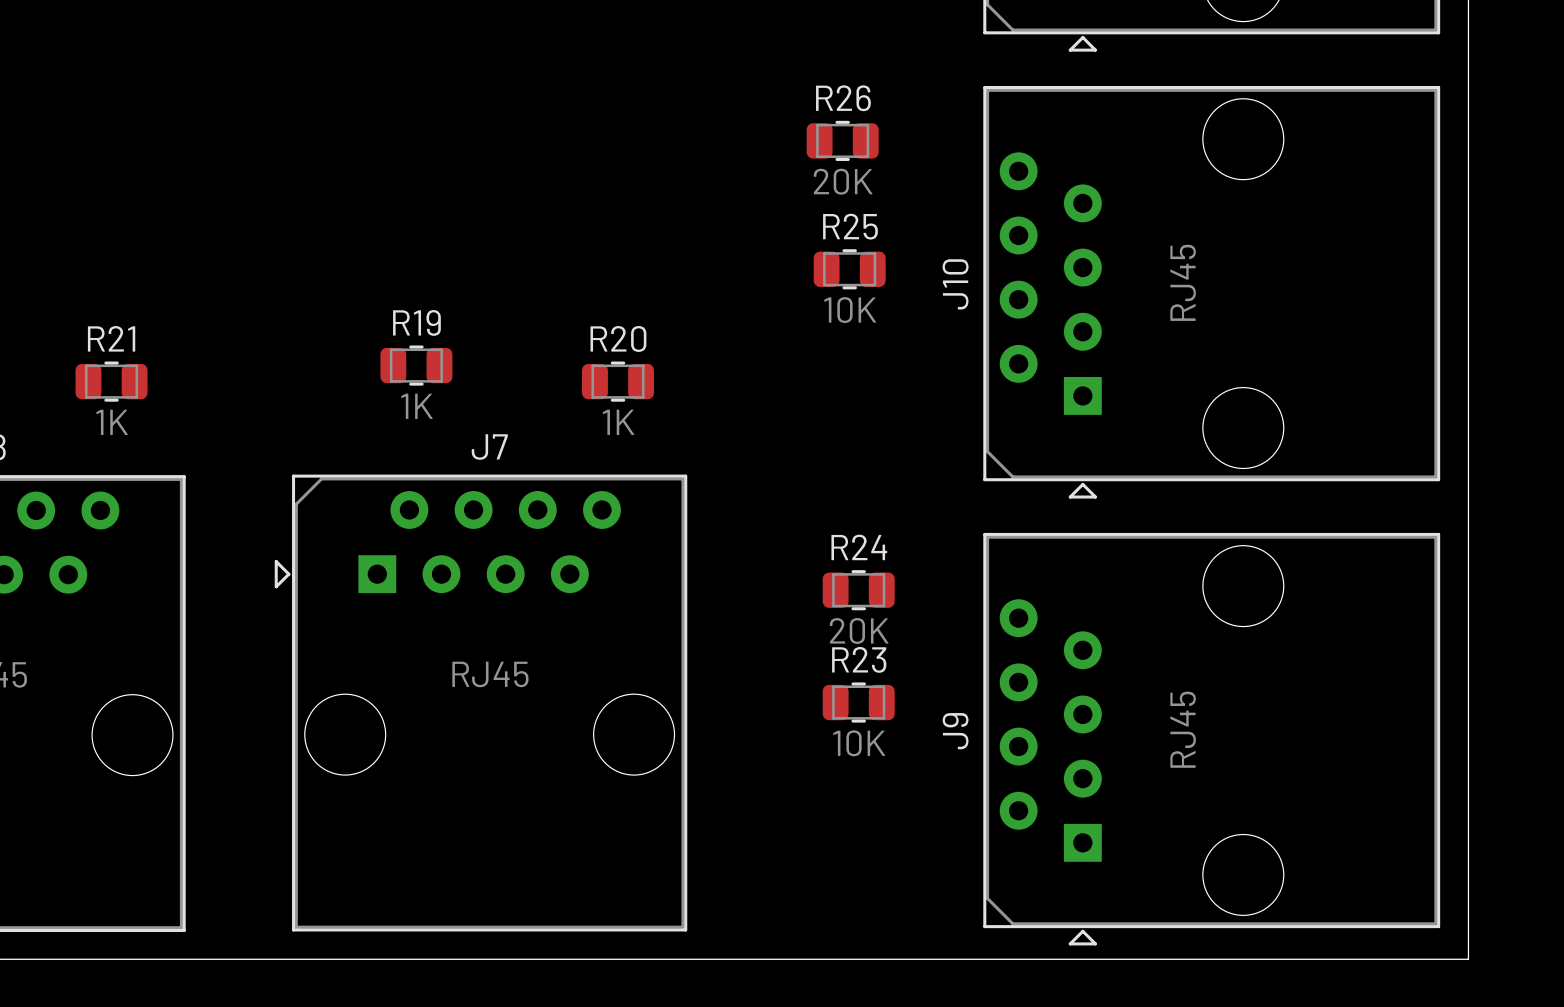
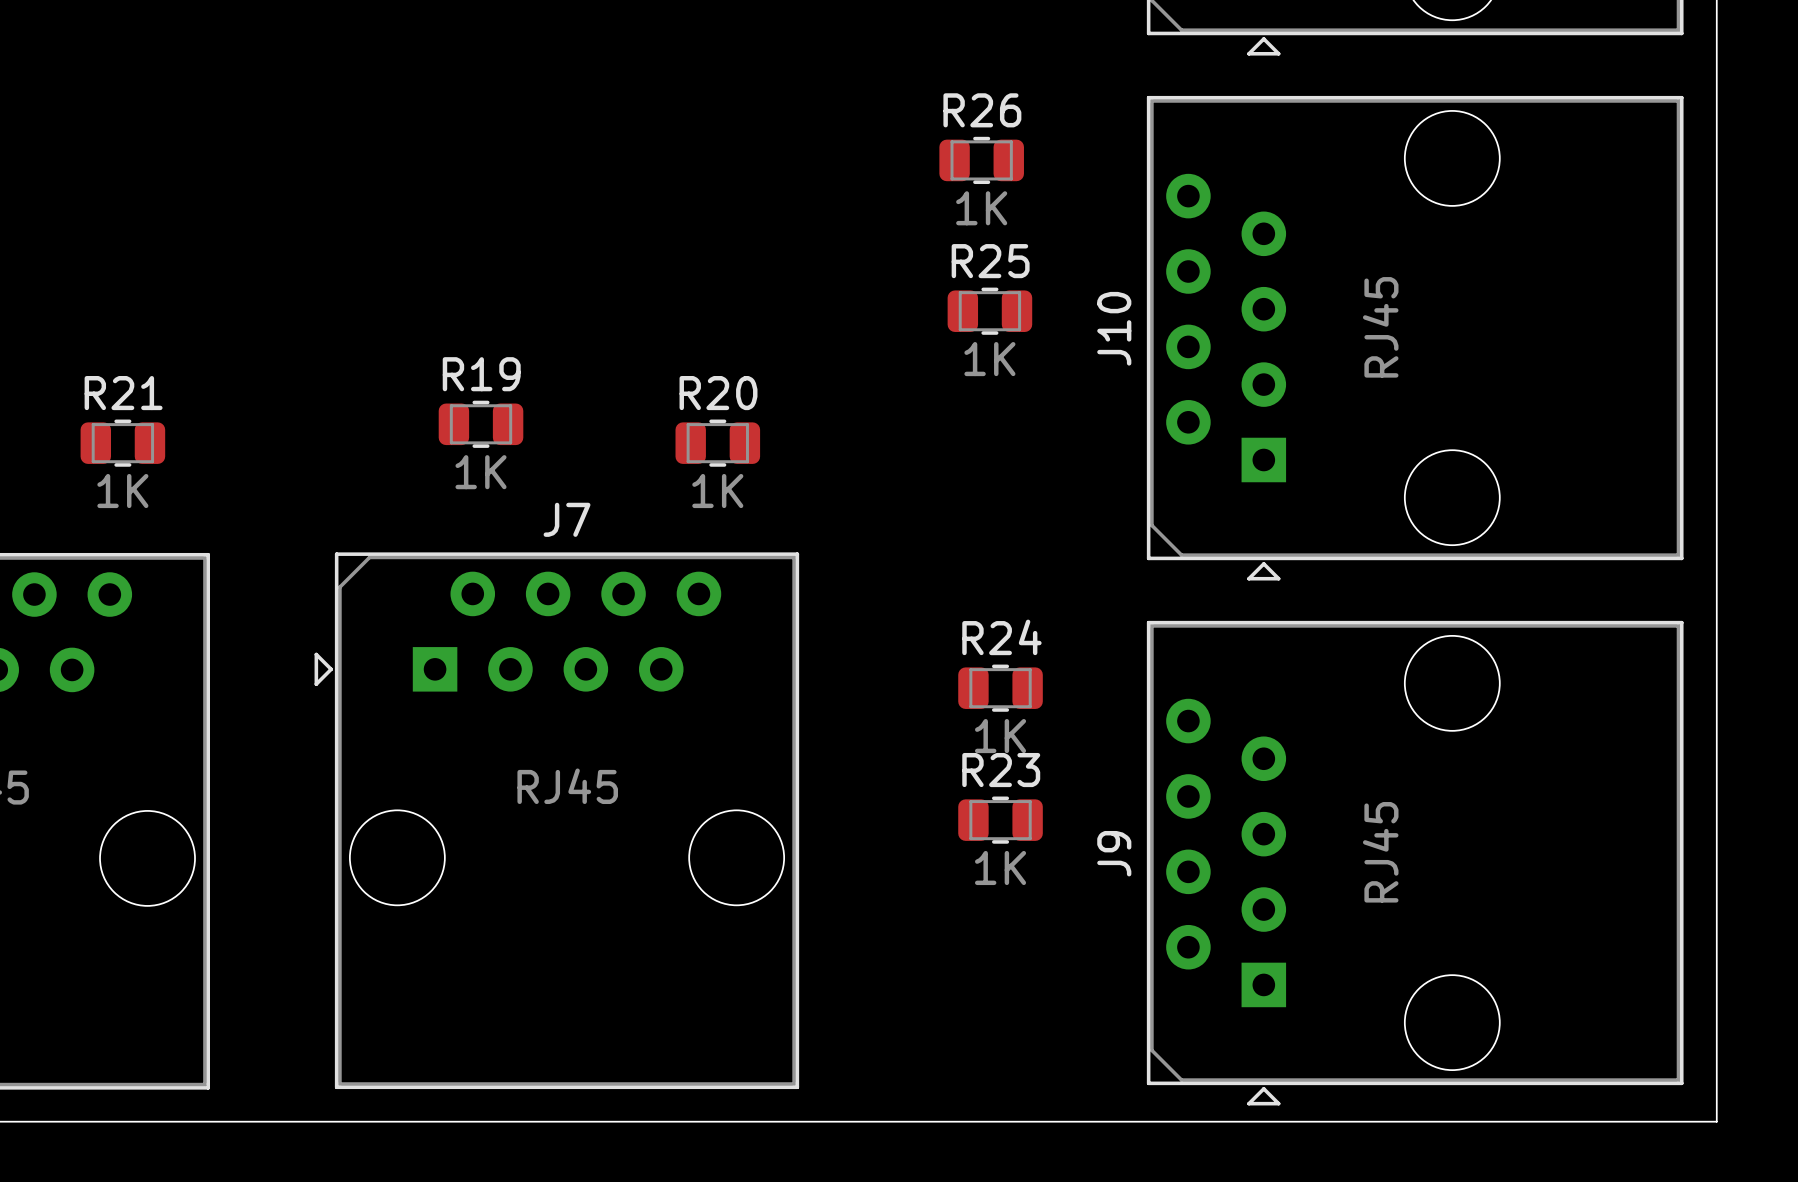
R26 value: 20K (843, 181) -> 1K (981, 208)
R25 value: 10K (850, 310) -> 1K (989, 359)
R24 value: 20K (859, 630) -> 1K (1000, 736)
R23 value: 10K (859, 743) -> 1K (1000, 867)

